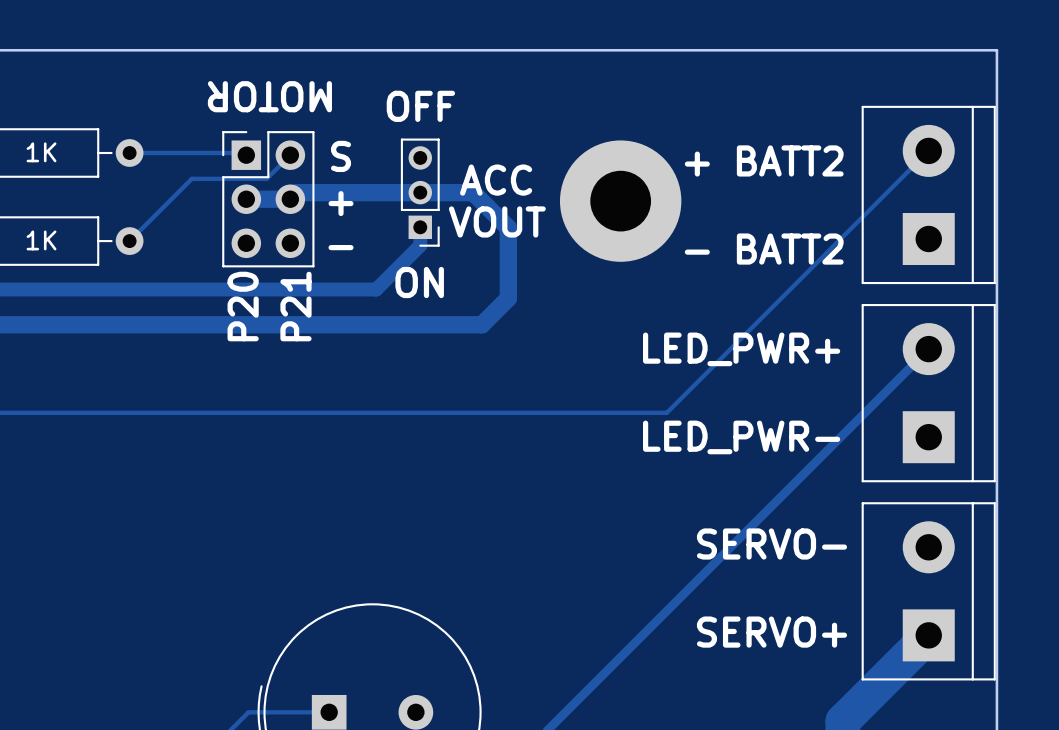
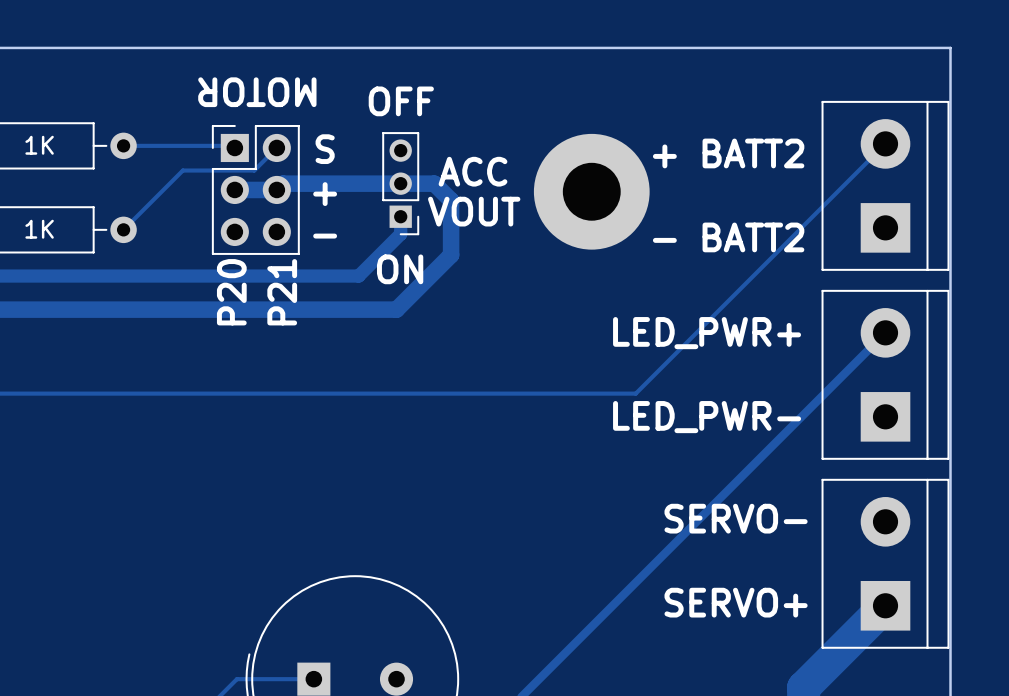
track: (455, 192) (473, 192) (508, 227) (508, 298) (481, 324) (415, 324) -> (434, 183) (451, 200) (451, 255) (396, 309)

